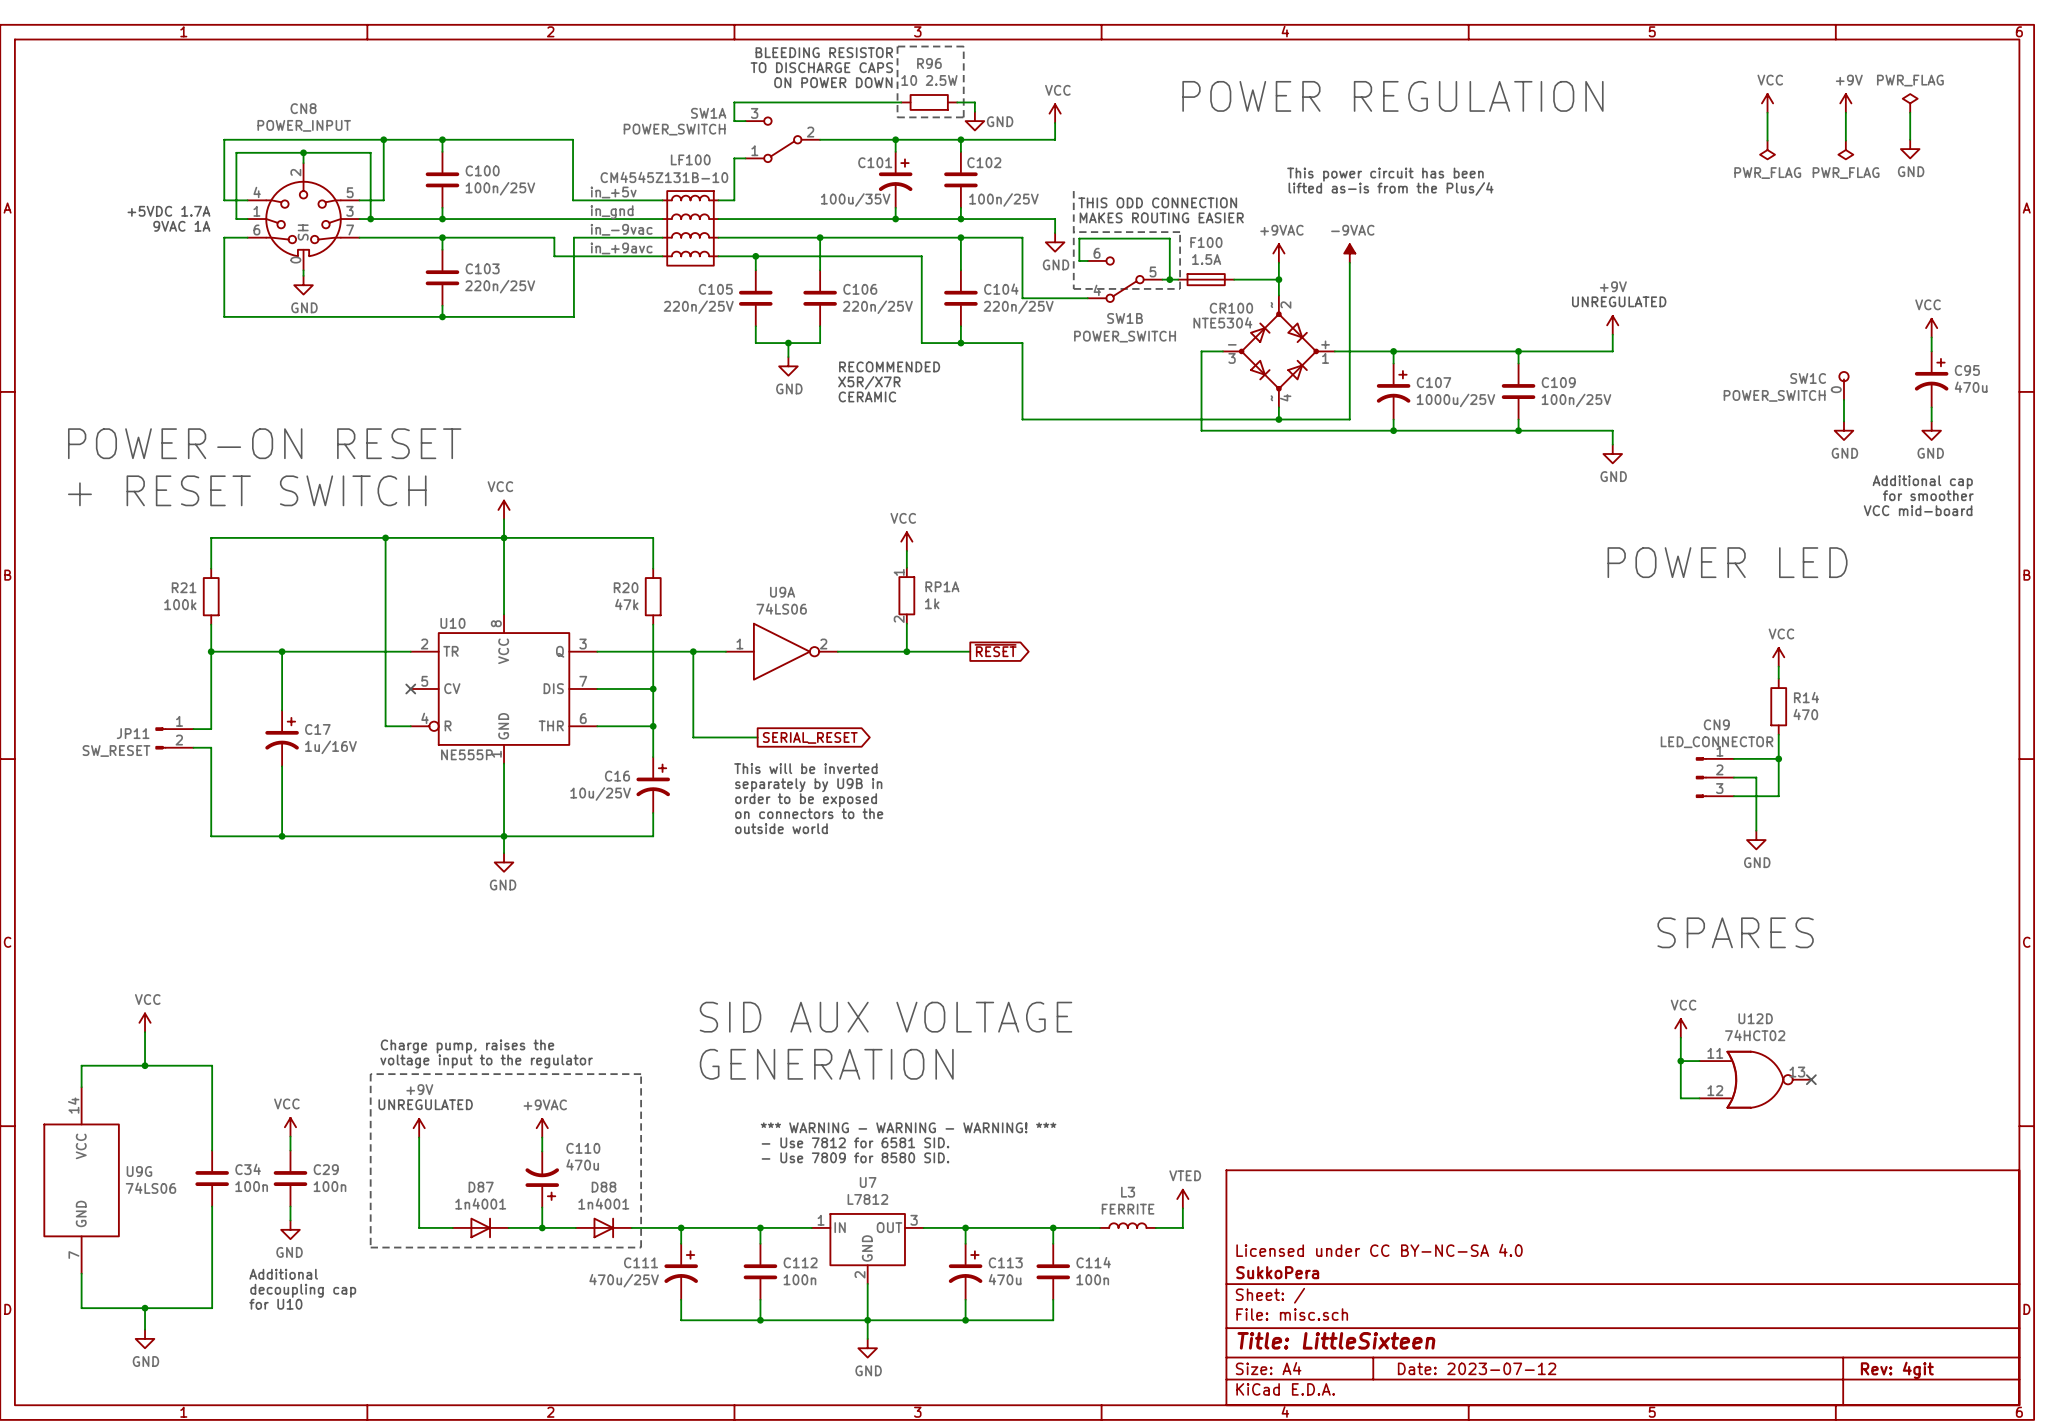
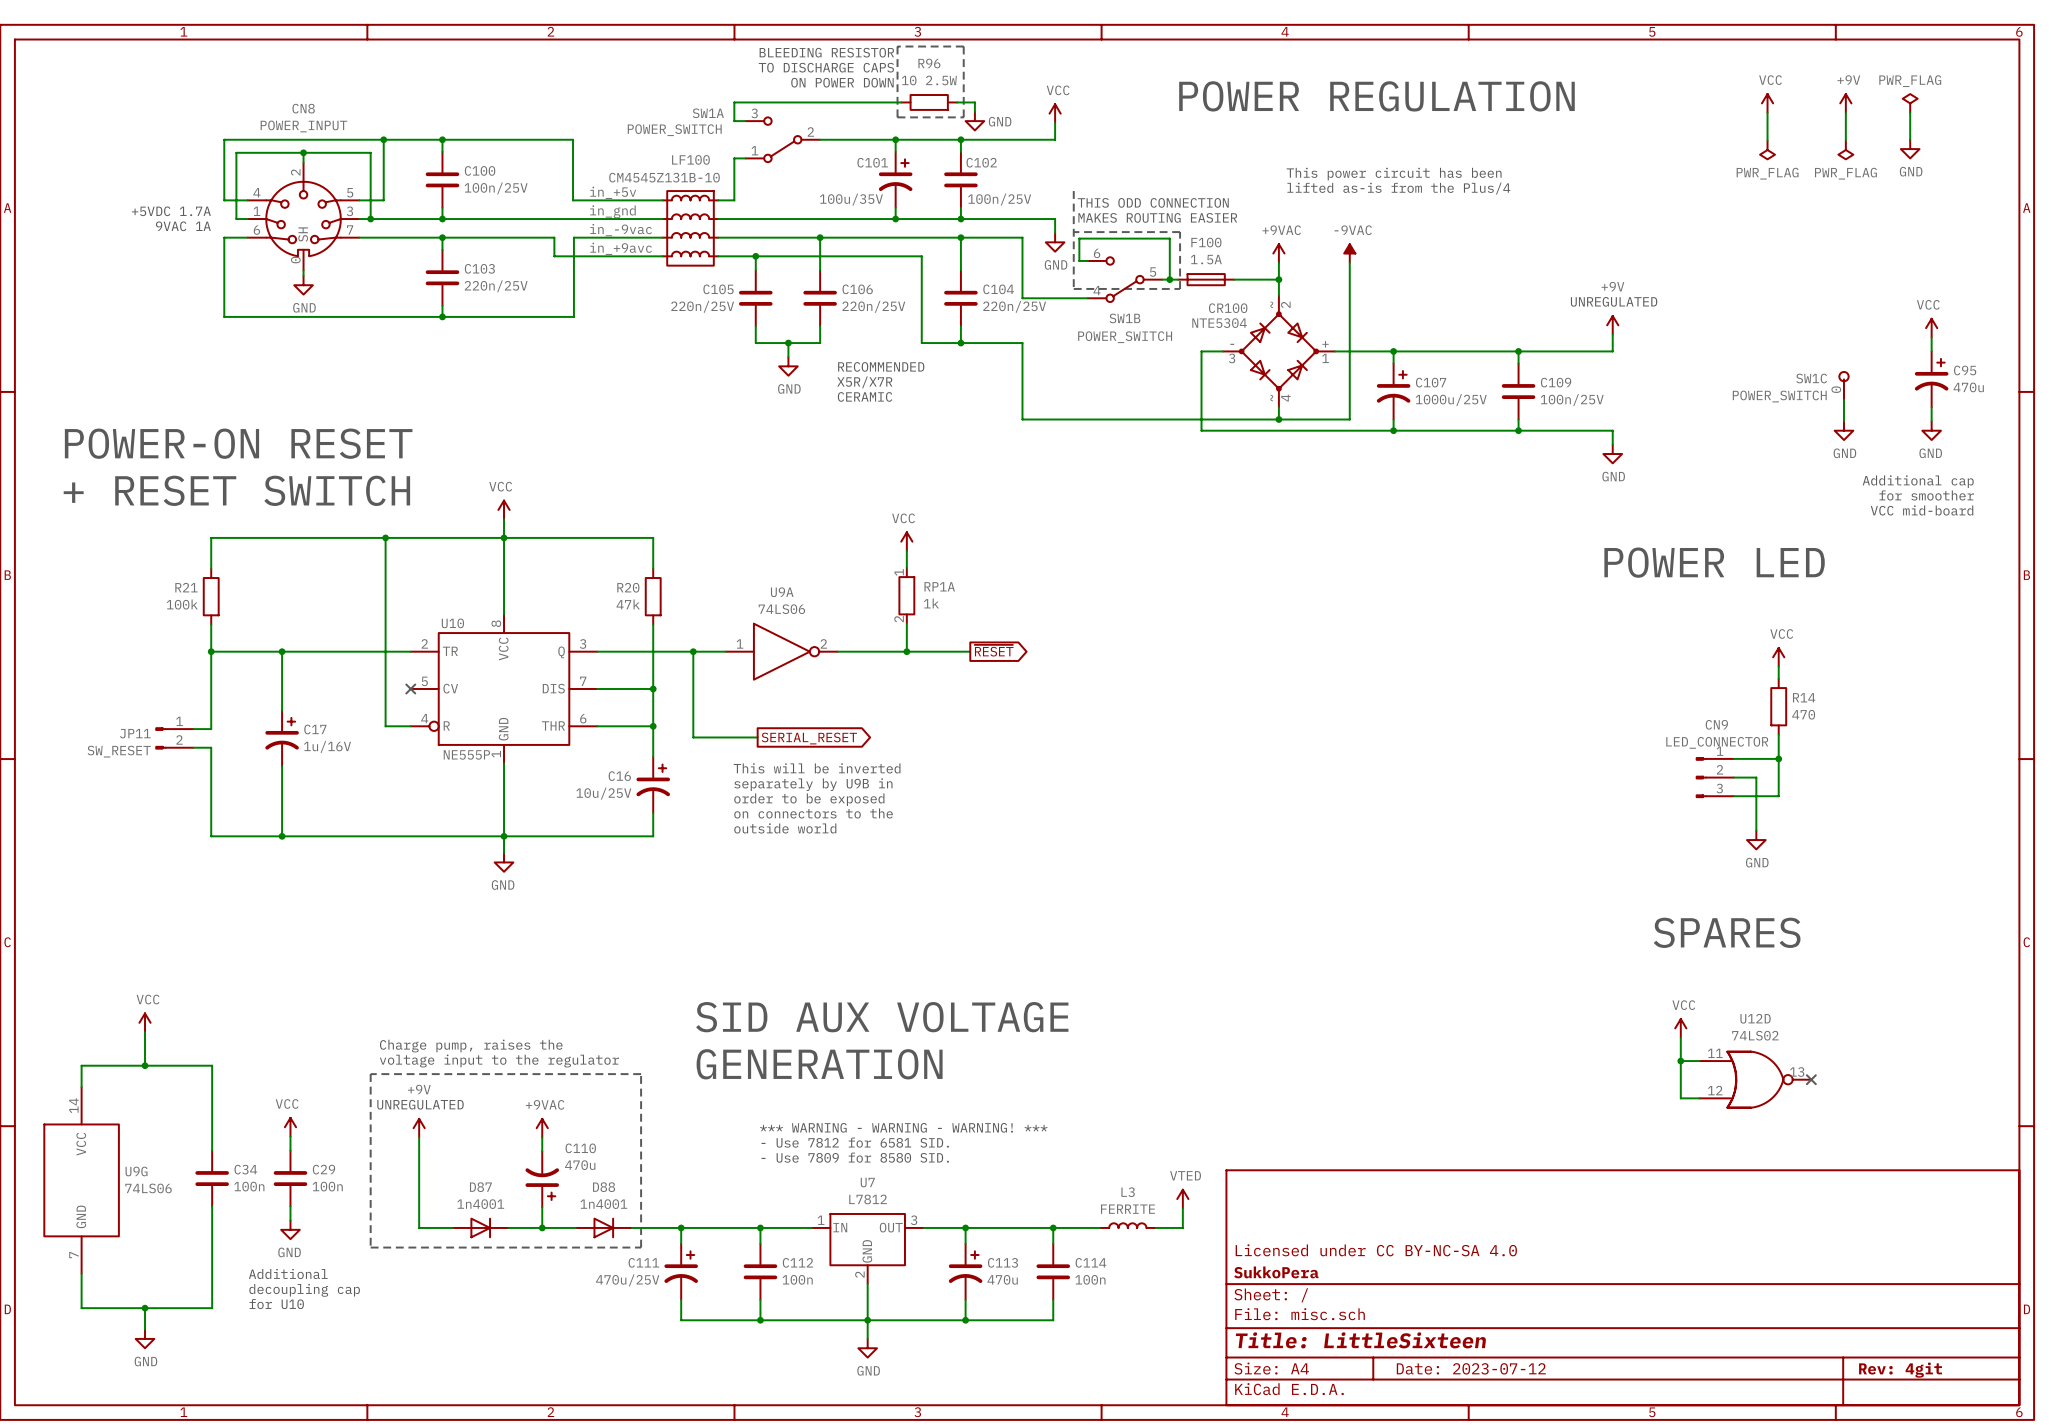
U12D value: 74HCT02 (1755, 1035) -> 74LS02 (1755, 1035)

